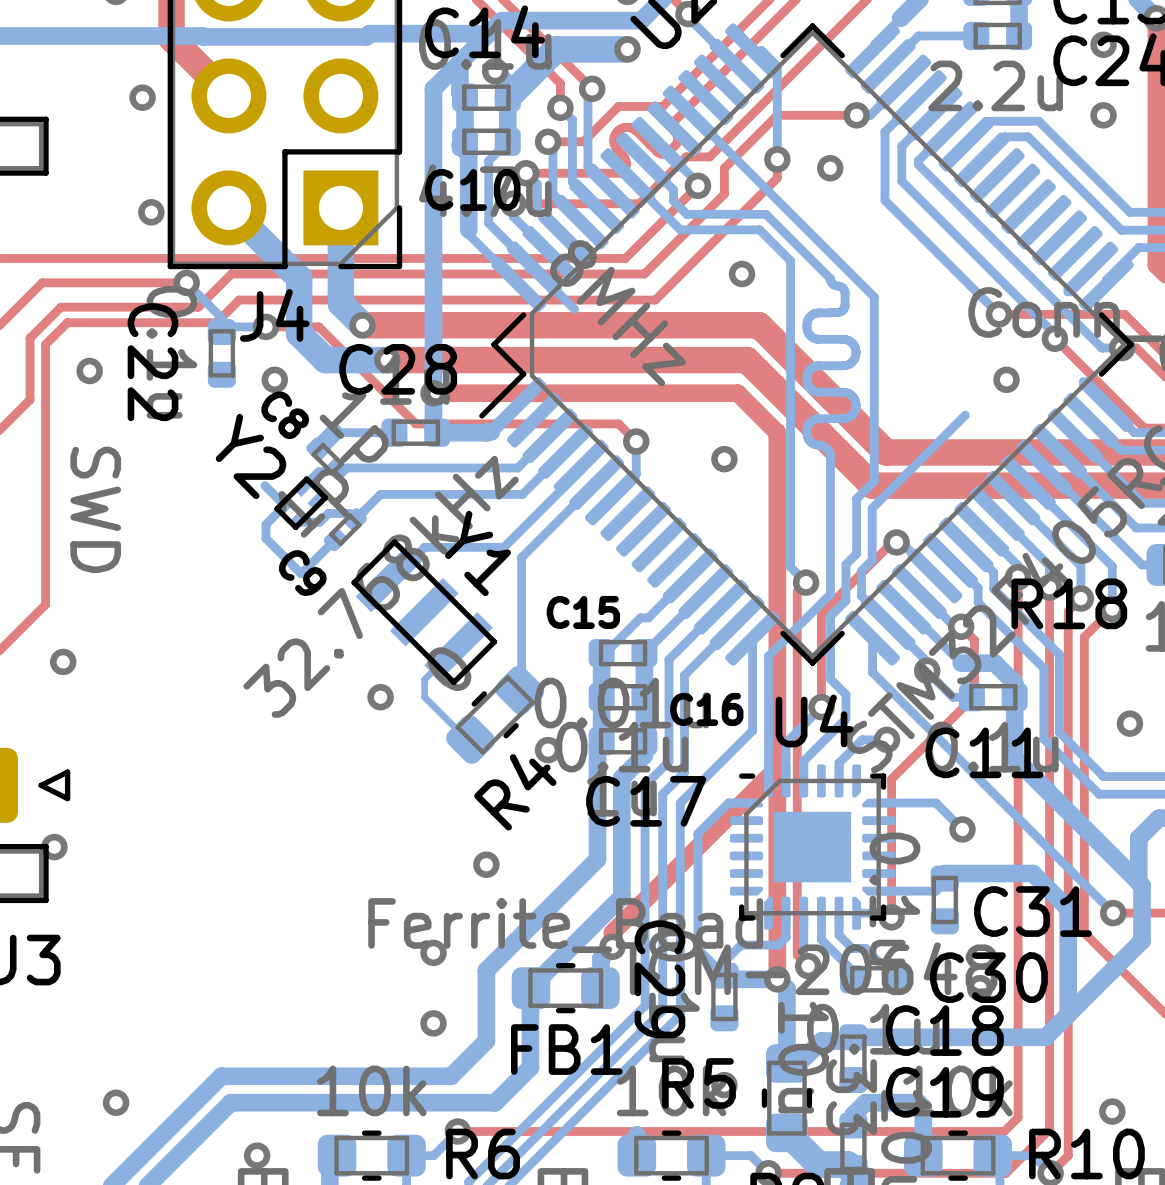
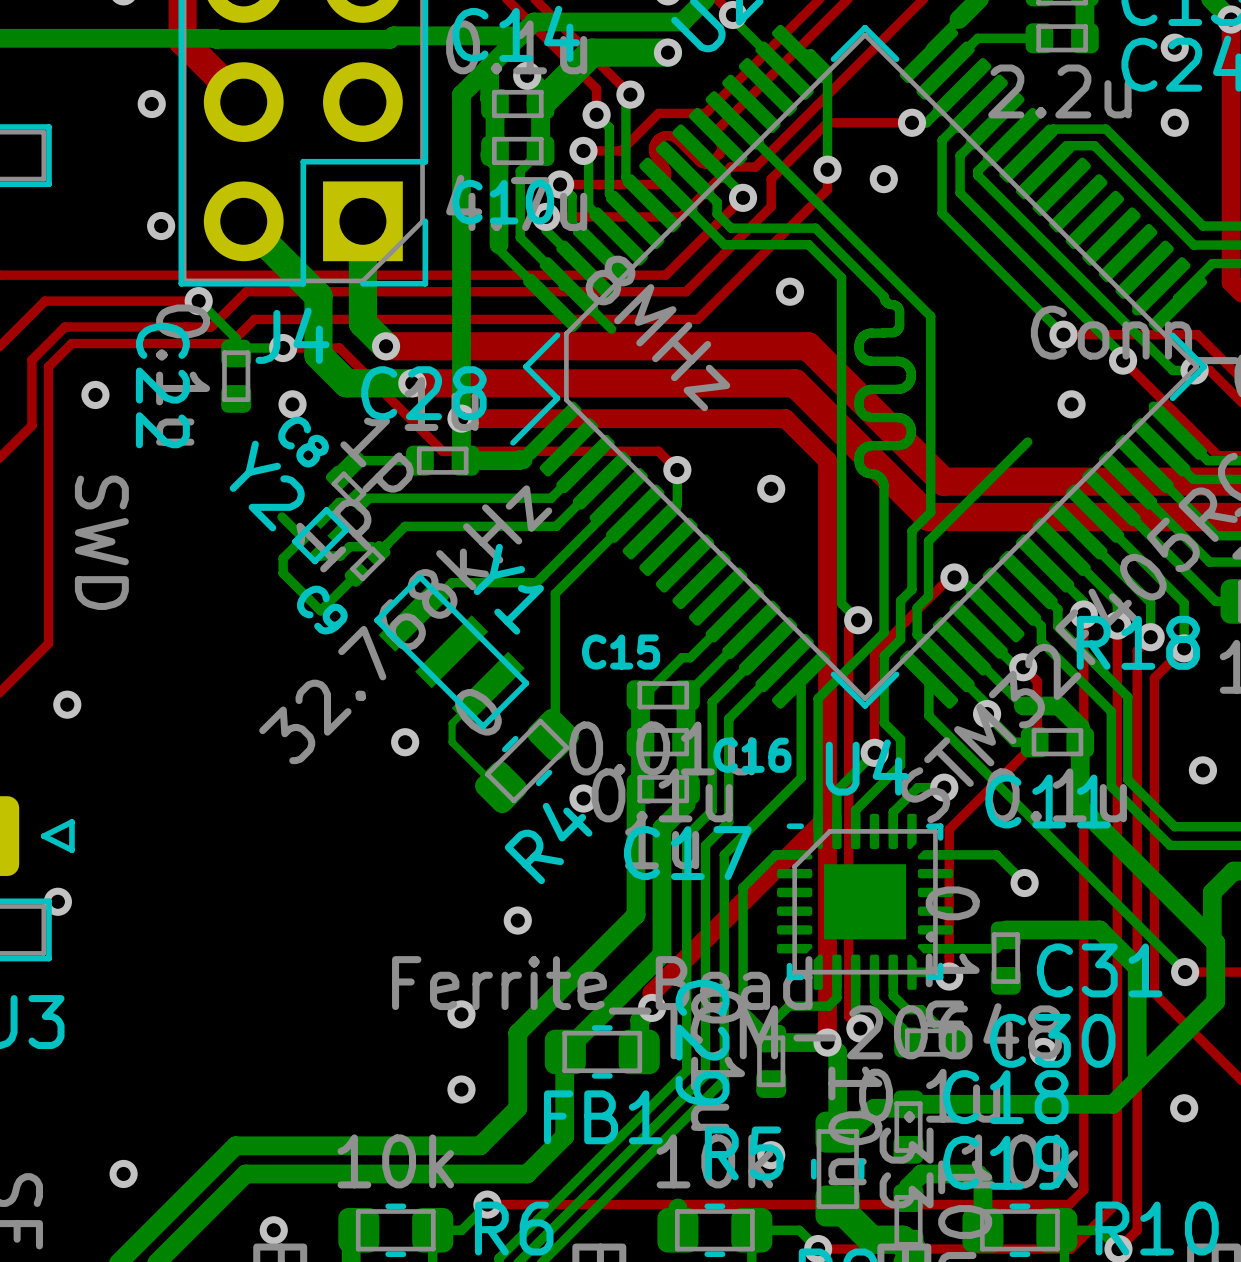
via: none -> (1184, 1108)
via: (1112, 1111) -> none

